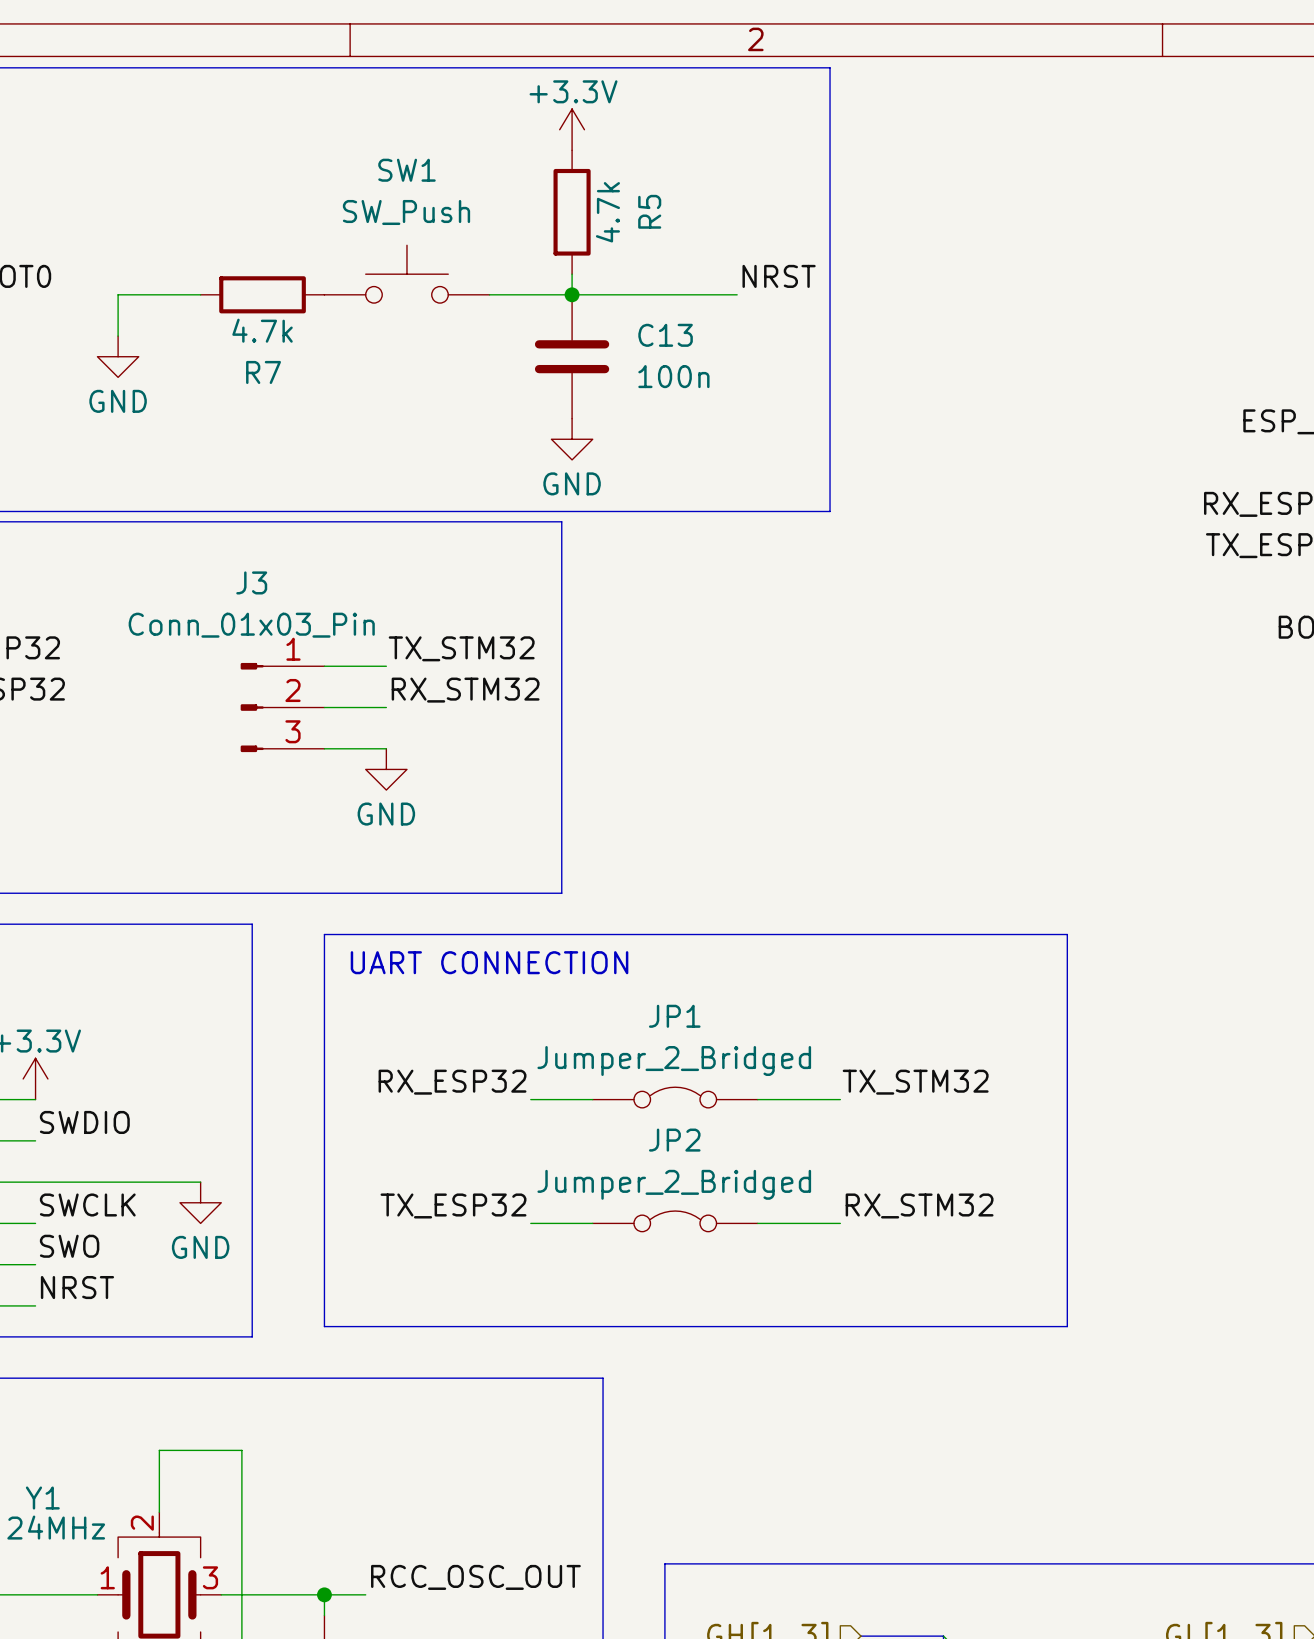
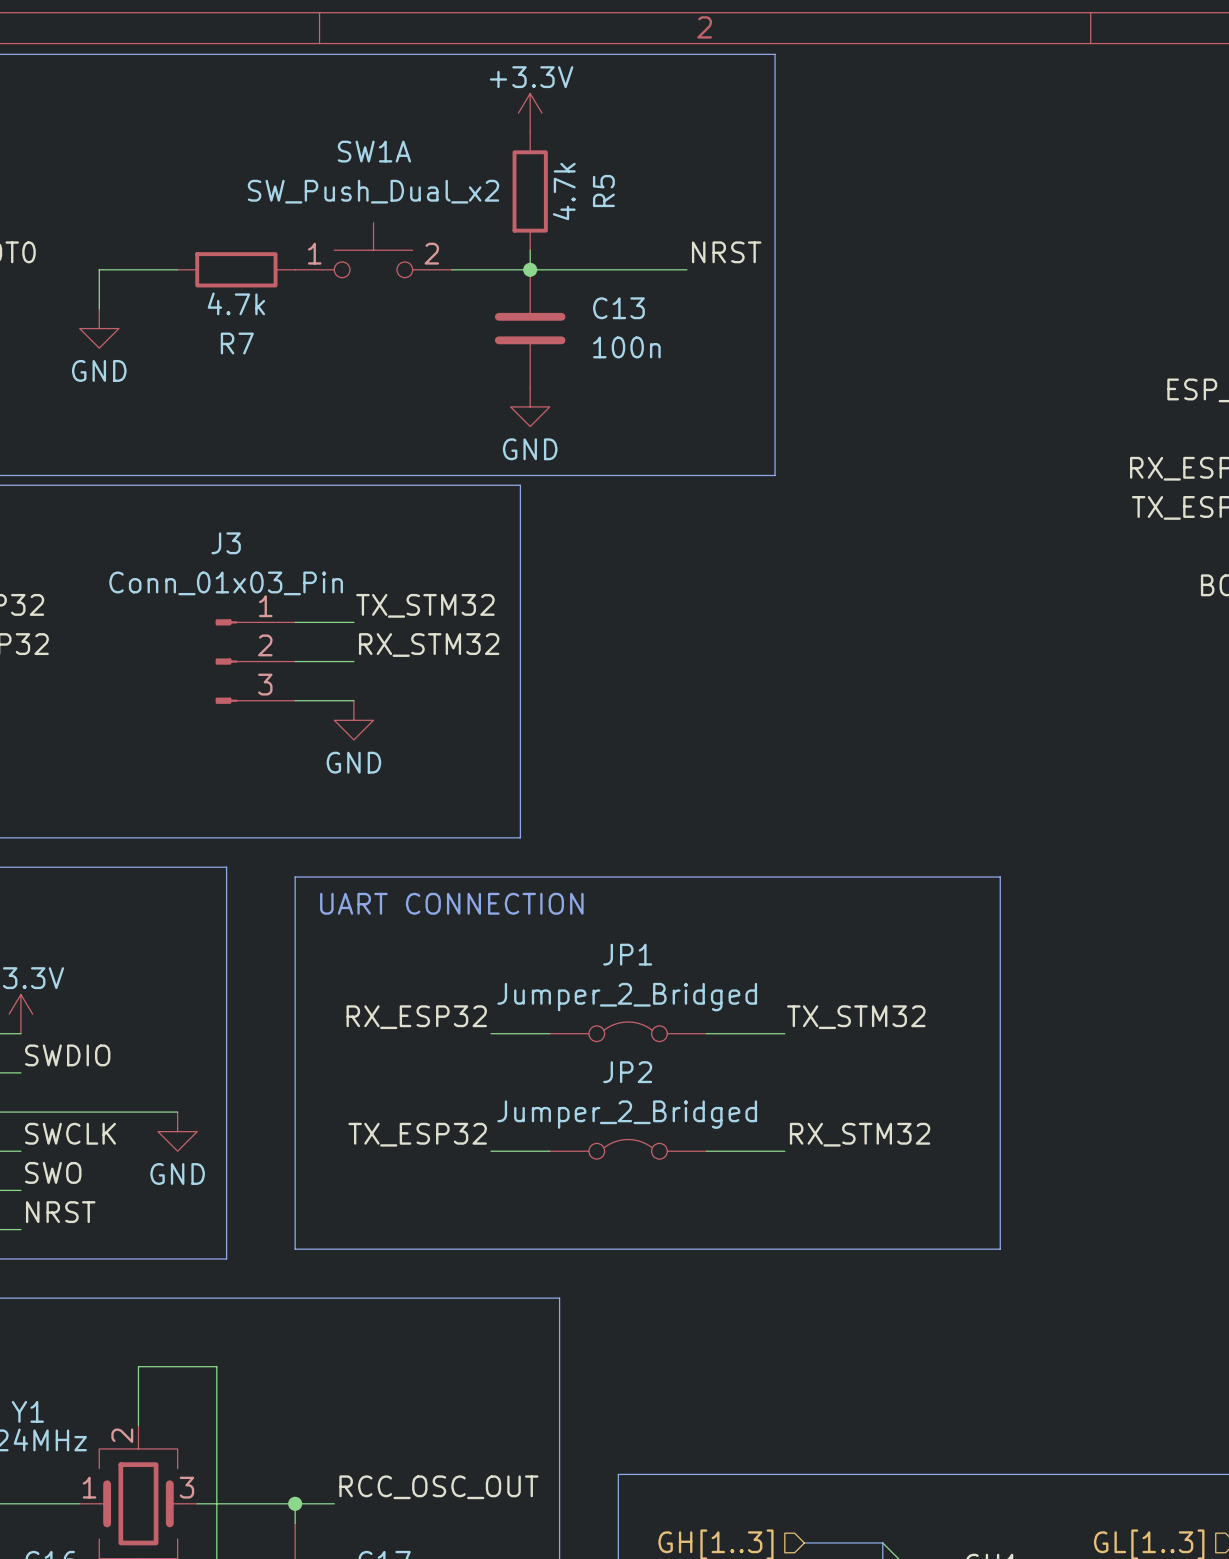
SW1 name: SW1 (406, 170) -> SW1A (374, 151)
SW1 value: SW_Push (406, 212) -> SW_Push_Dual_x2 (373, 191)
SW1 pin number: none -> 1 (314, 253)
SW1 pin number: none -> 2 (431, 253)

